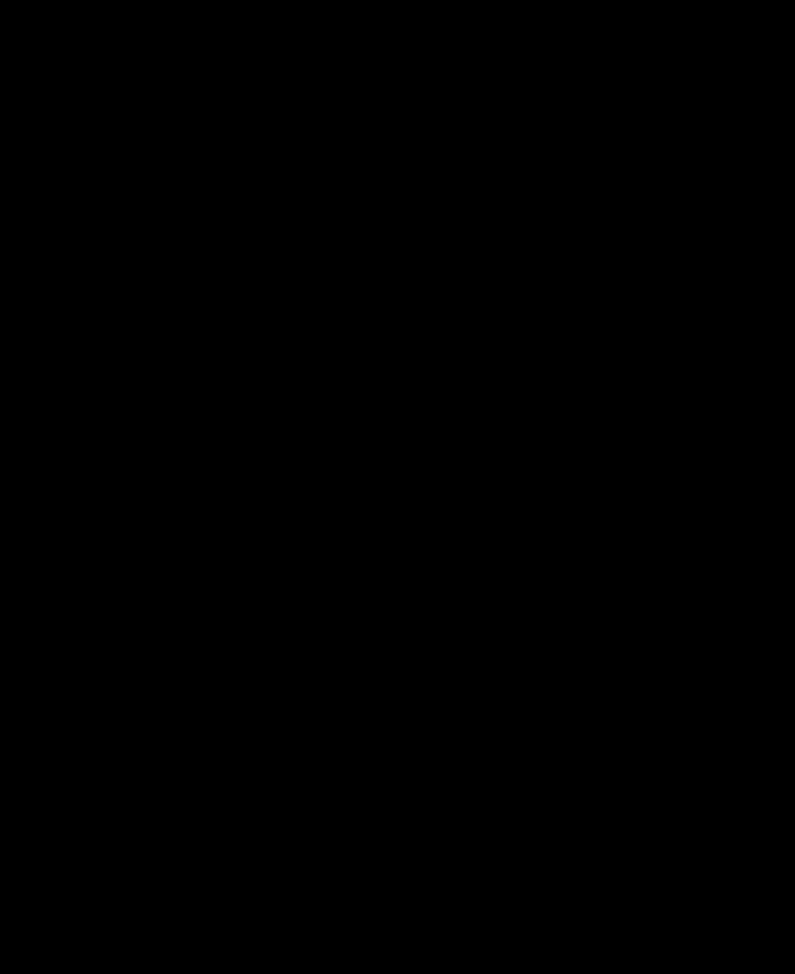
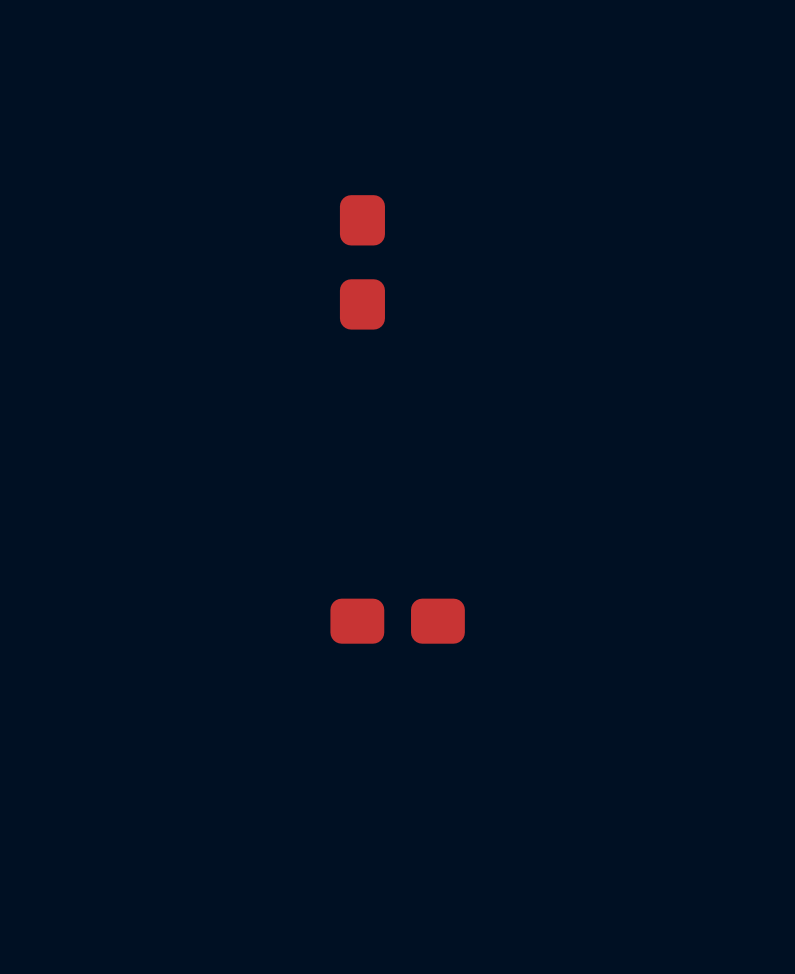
part: none -> (362, 262)
part: none -> (397, 621)

